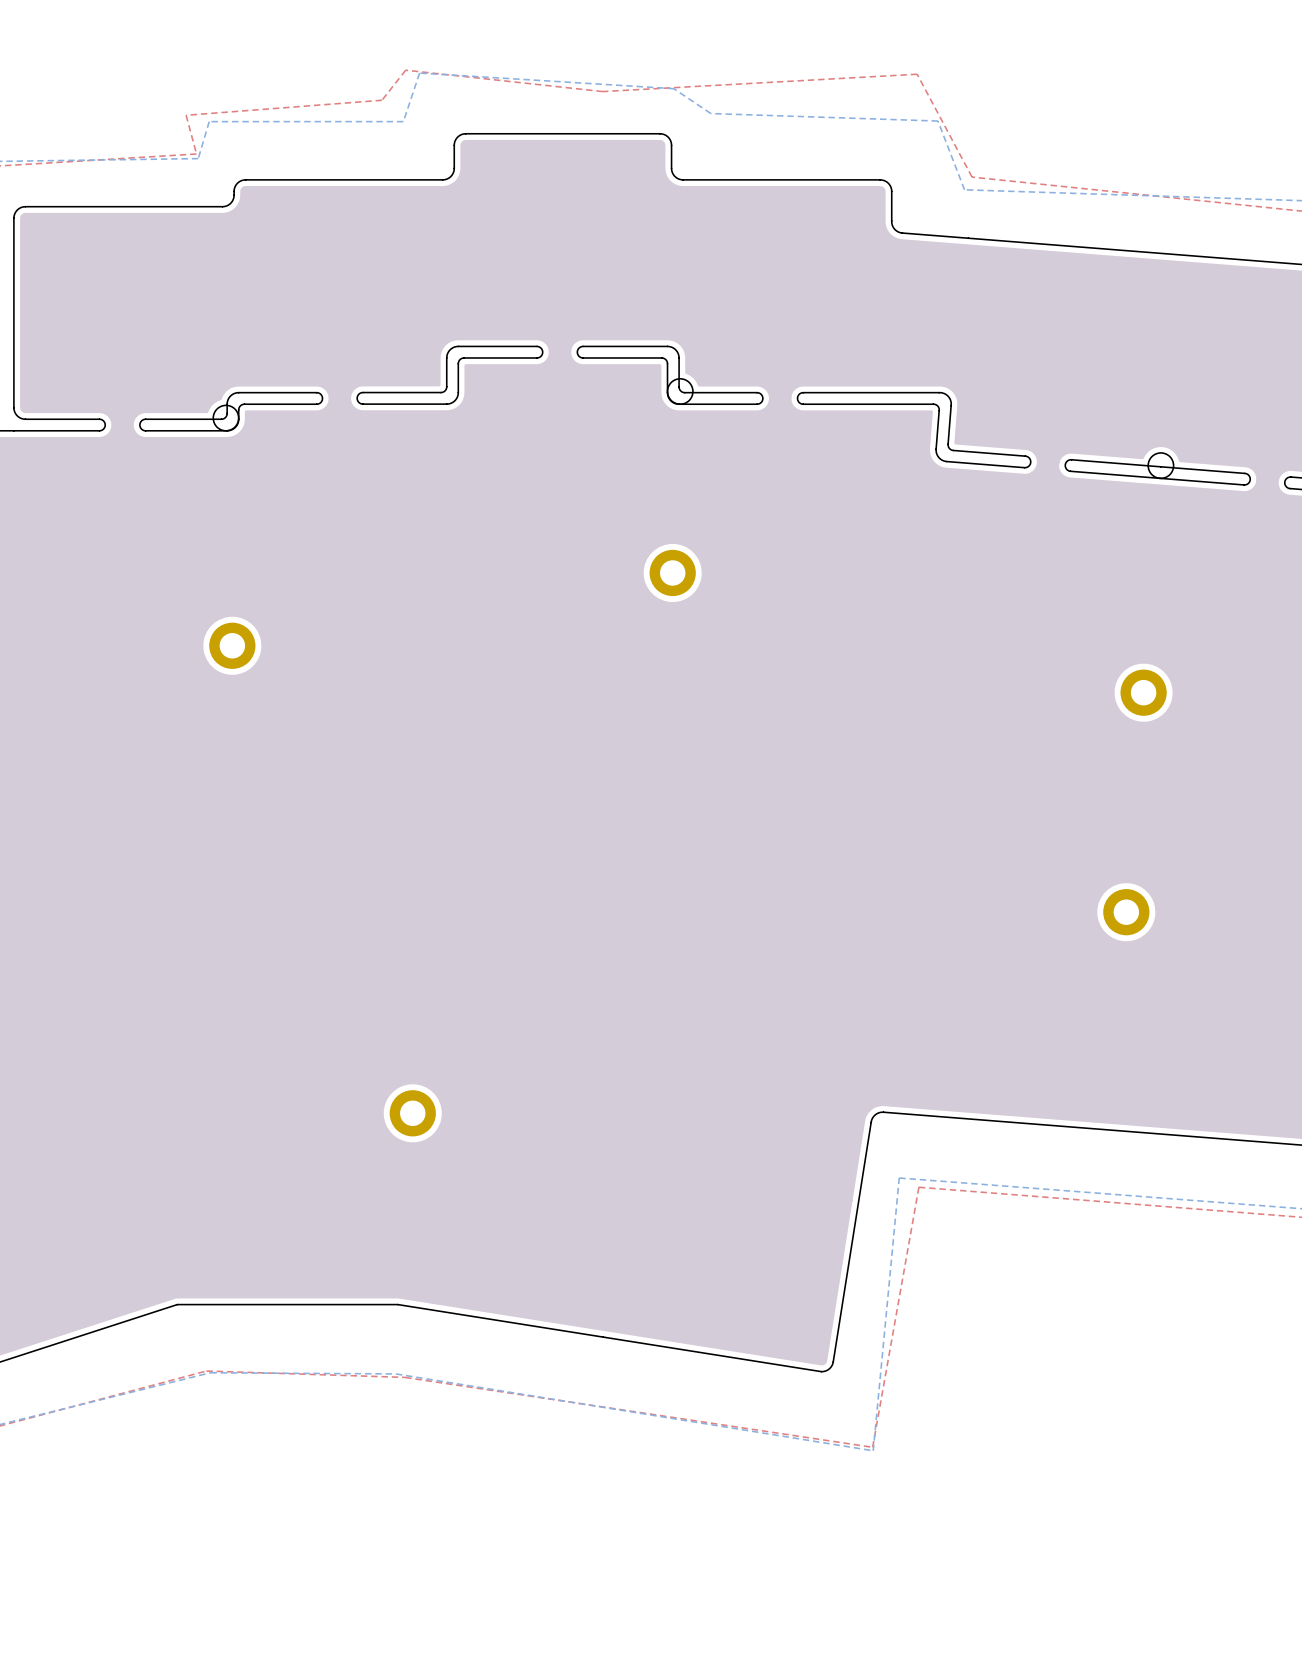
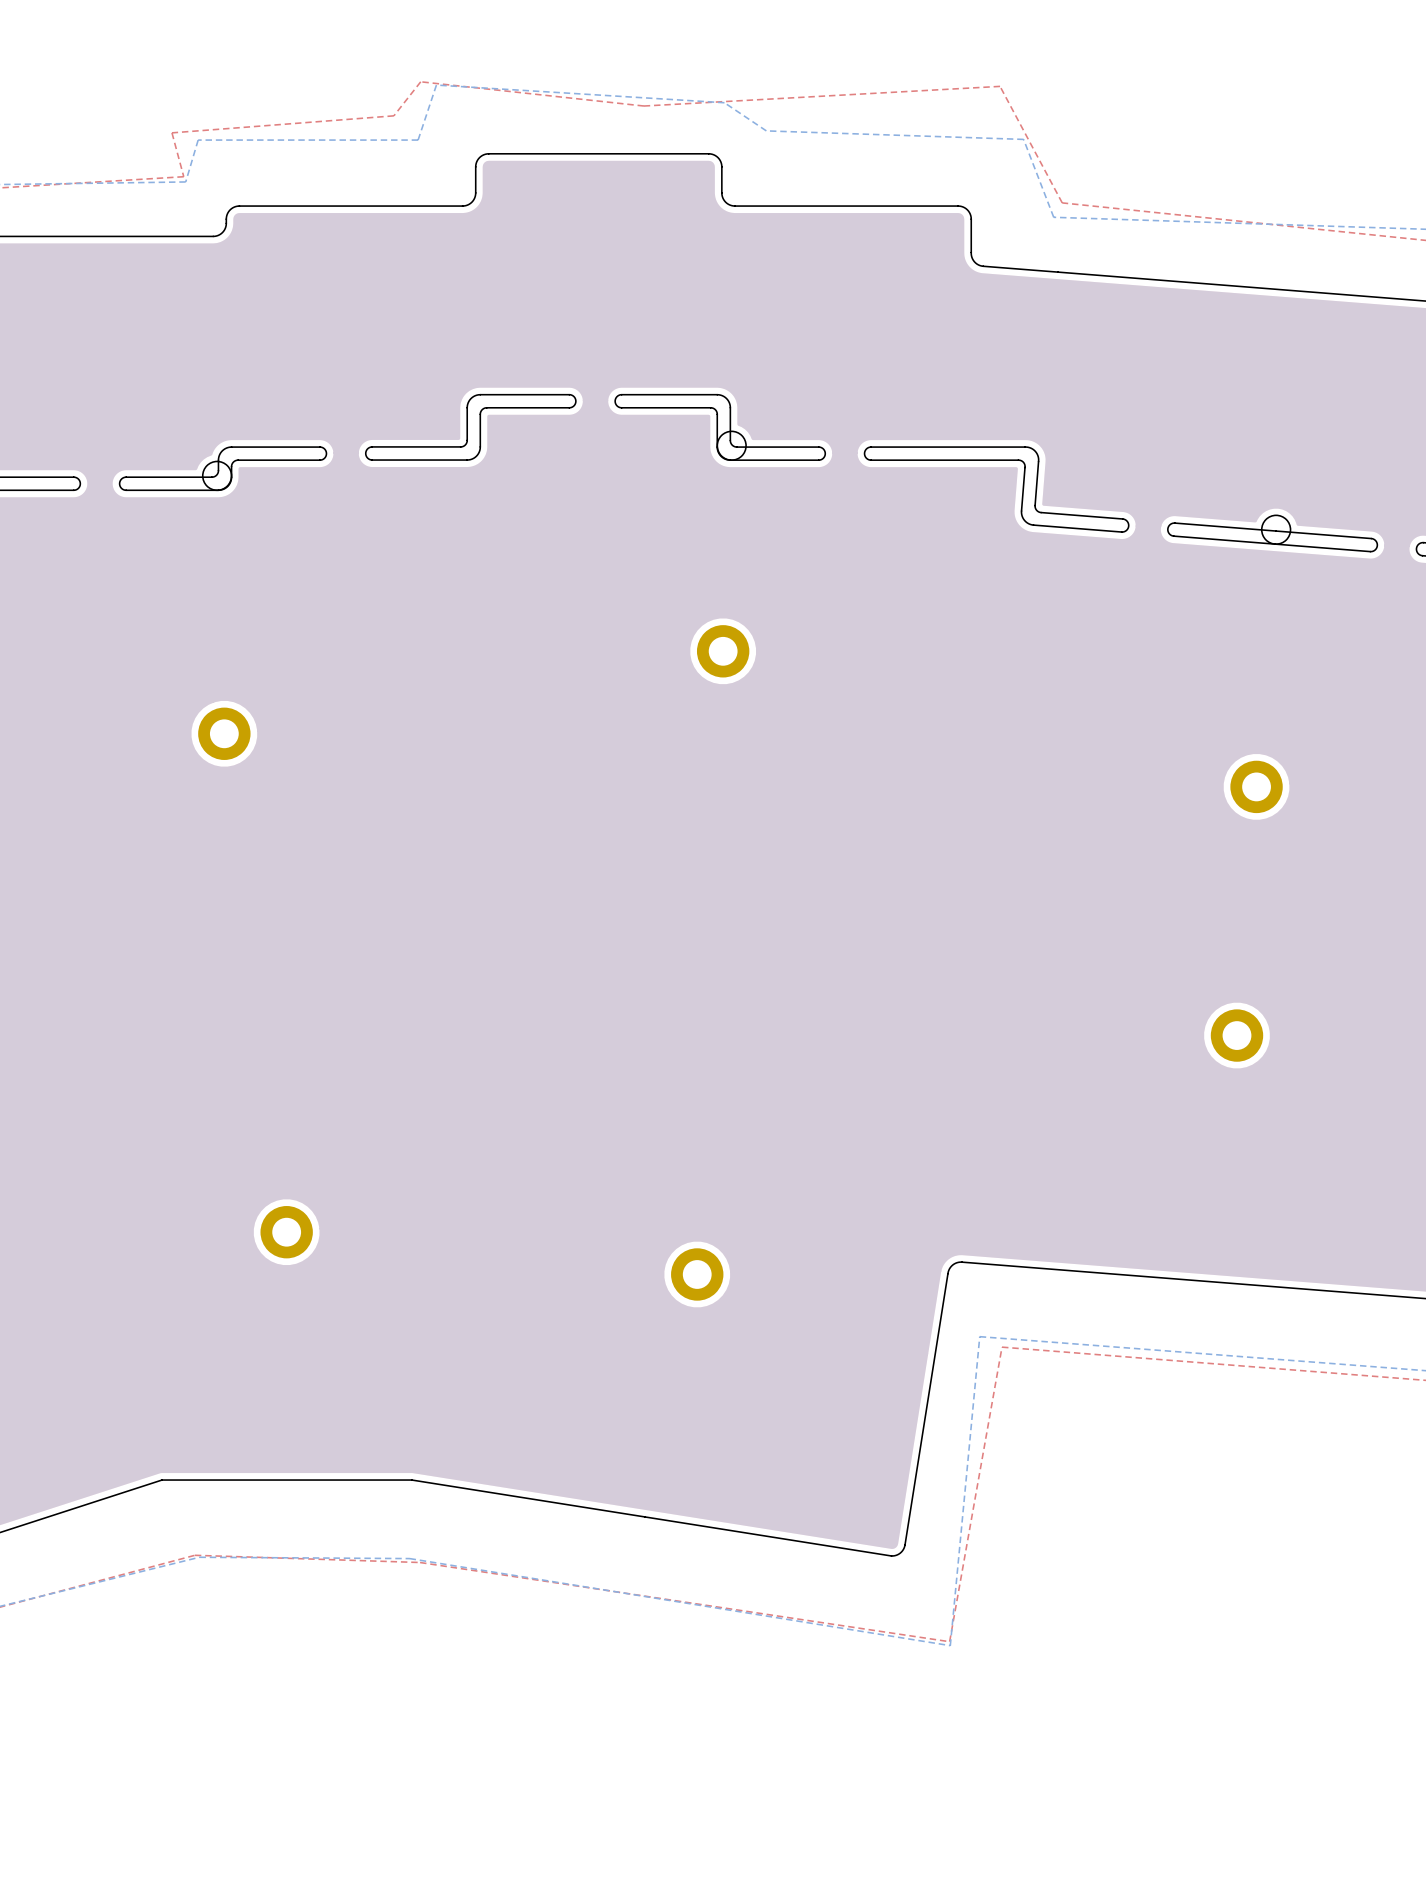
part: none -> (286, 1232)
part: (412, 1113) -> none
part: none -> (697, 1274)

